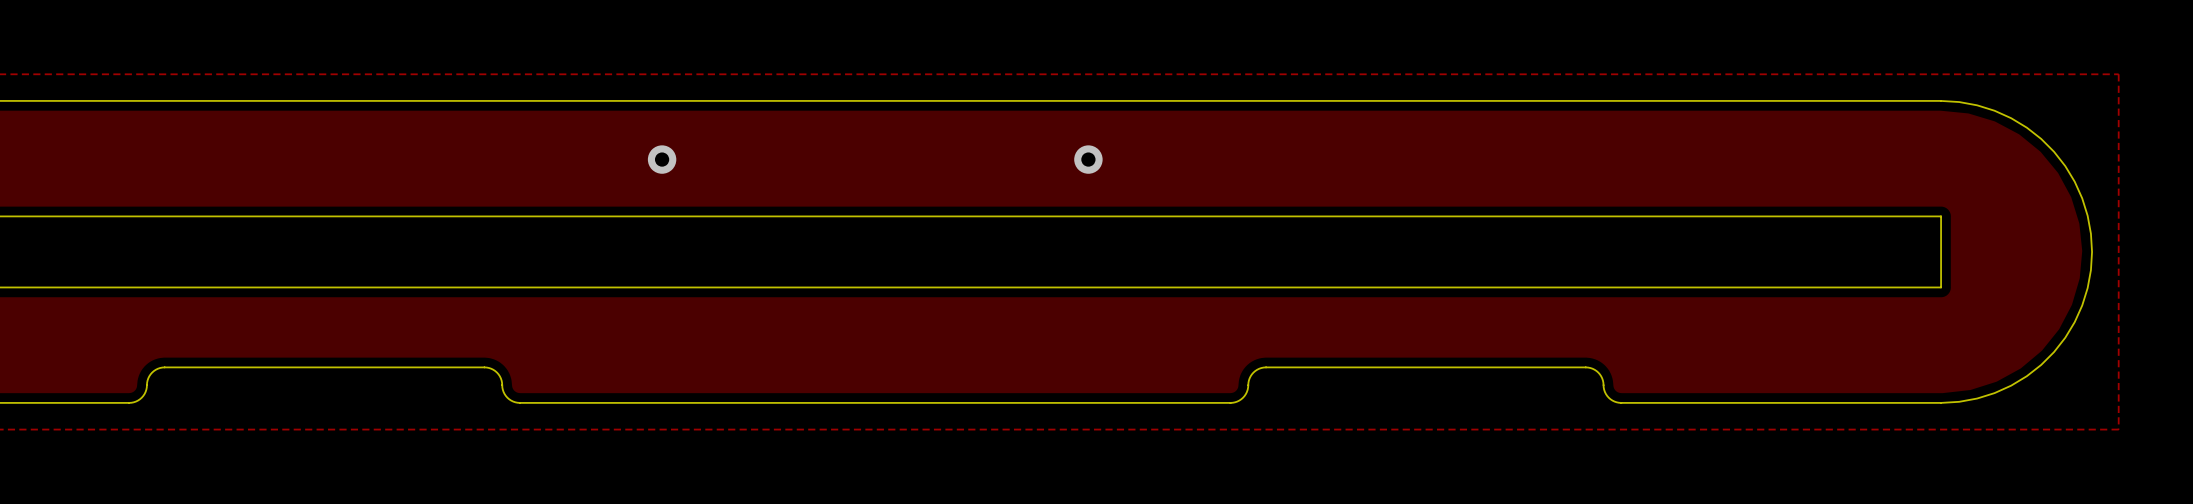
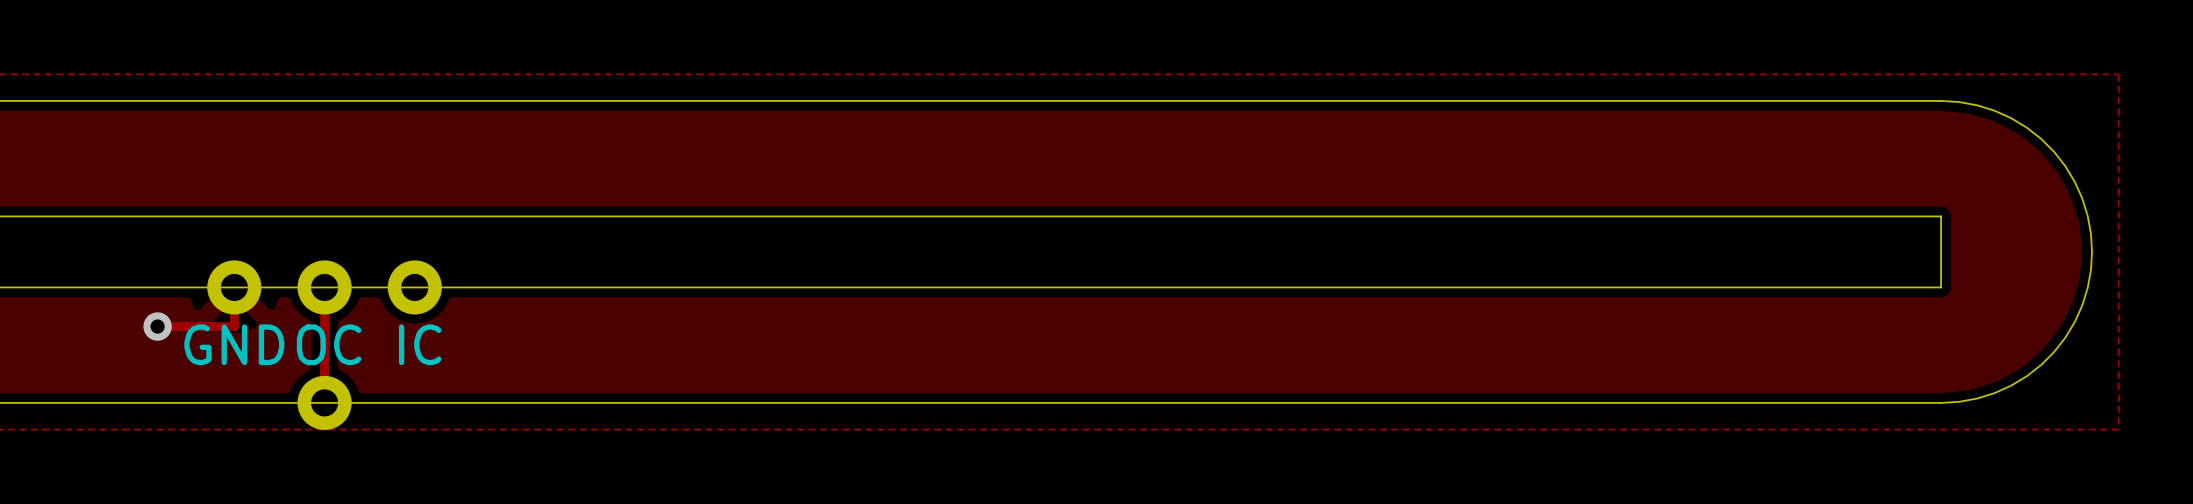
via: (662, 159) -> none
via: (1088, 159) -> none
part: none -> (324, 287)
track: none -> (234, 299) (234, 326) (157, 326)
track: none -> (324, 299) (324, 390)
via: none -> (157, 326)
board edge: (129, 402) (141, 397) (145, 391) (150, 374) (155, 369) (164, 367) (486, 367) (498, 374) (503, 391) (507, 397) (519, 402) -> (129, 402) (519, 402)
part: none -> (324, 402)
board edge: (1230, 402) (1243, 397) (1246, 391) (1251, 374) (1257, 369) (1266, 367) (1588, 367) (1599, 374) (1604, 391) (1608, 397) (1621, 402) -> (1230, 402) (1621, 402)

